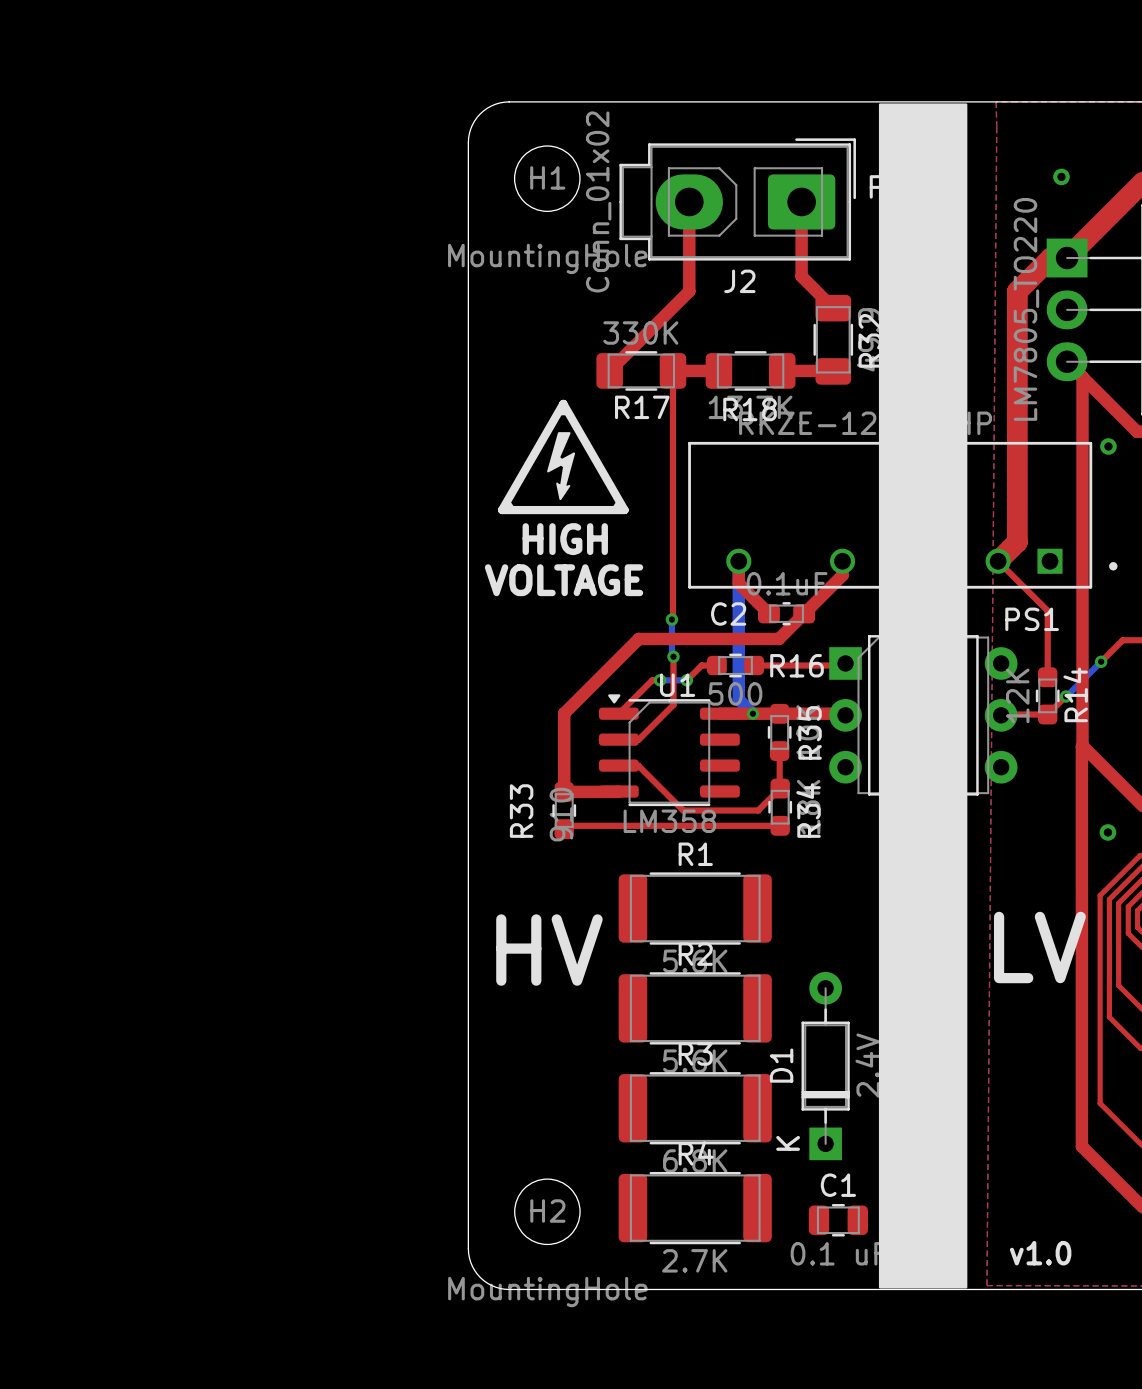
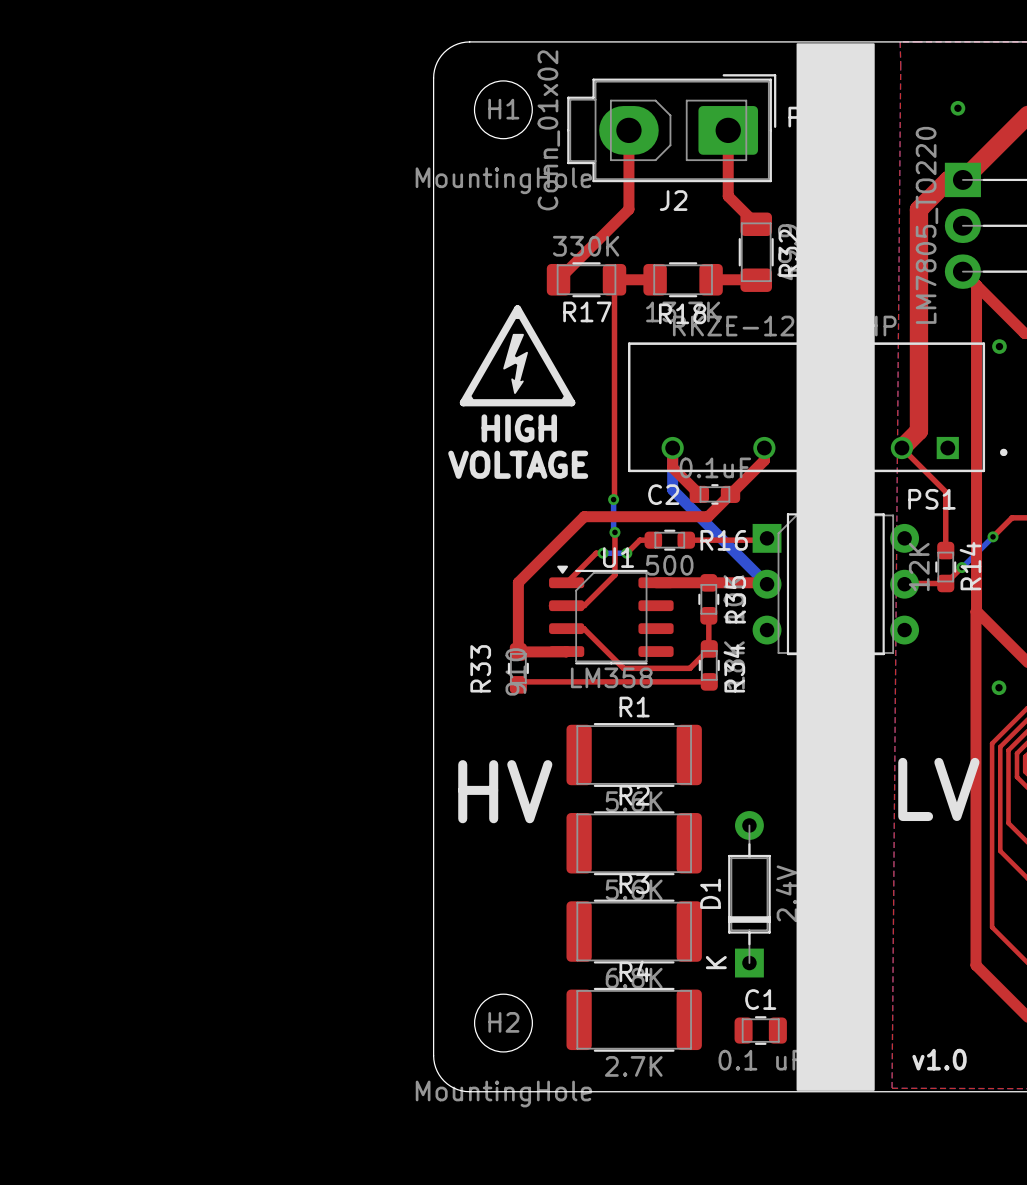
bottom track: (738, 608) (738, 699) (752, 713) -> (672, 489) (767, 584)
via: (752, 713) -> none

